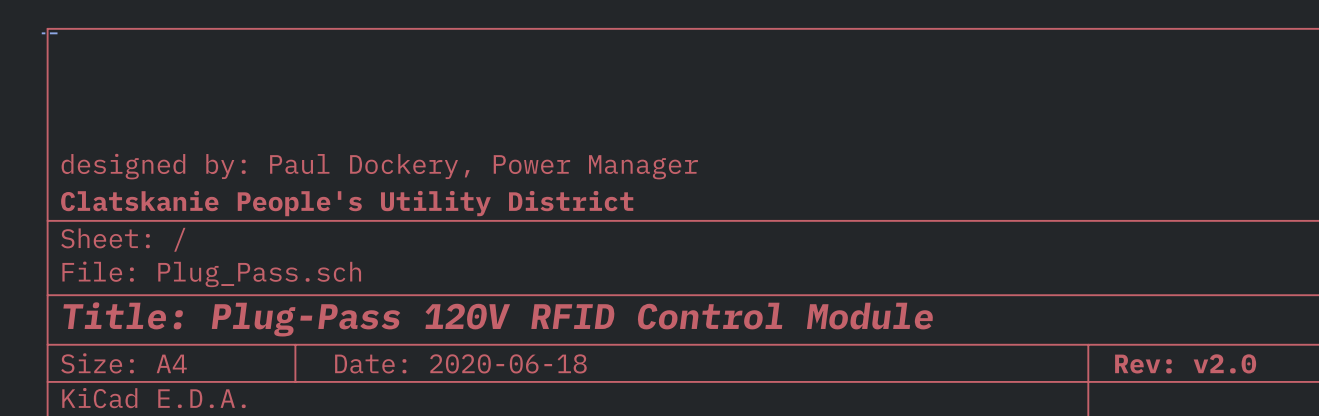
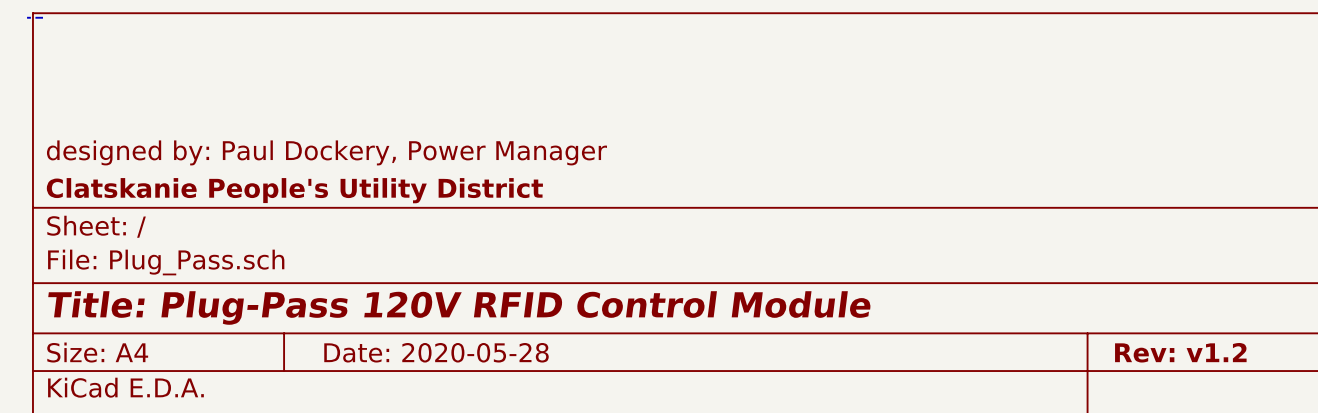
title block: Date: 2020-06-18 (460, 363) -> Date: 2020-05-28 (436, 352)
title block: Rev: v2.0 (1185, 363) -> Rev: v1.2 (1180, 352)

